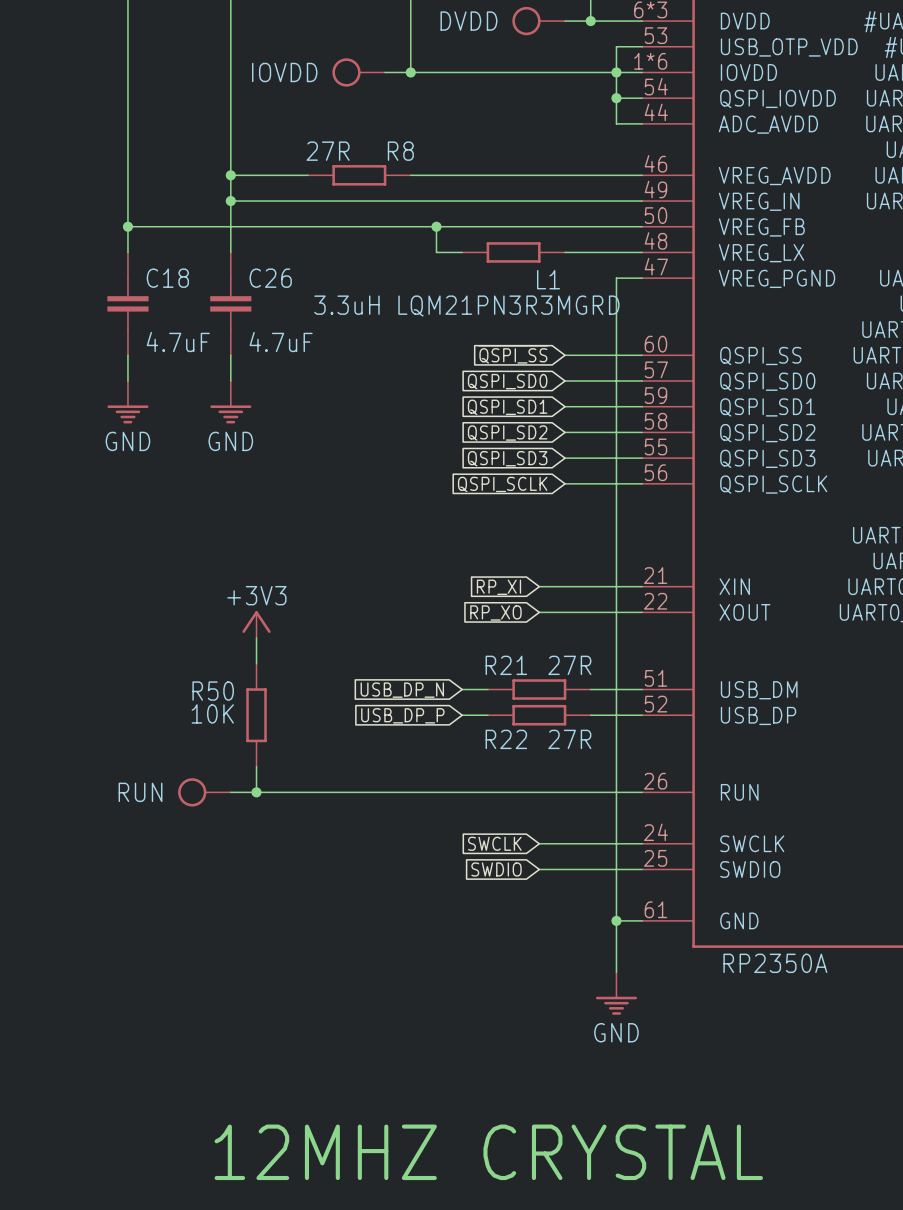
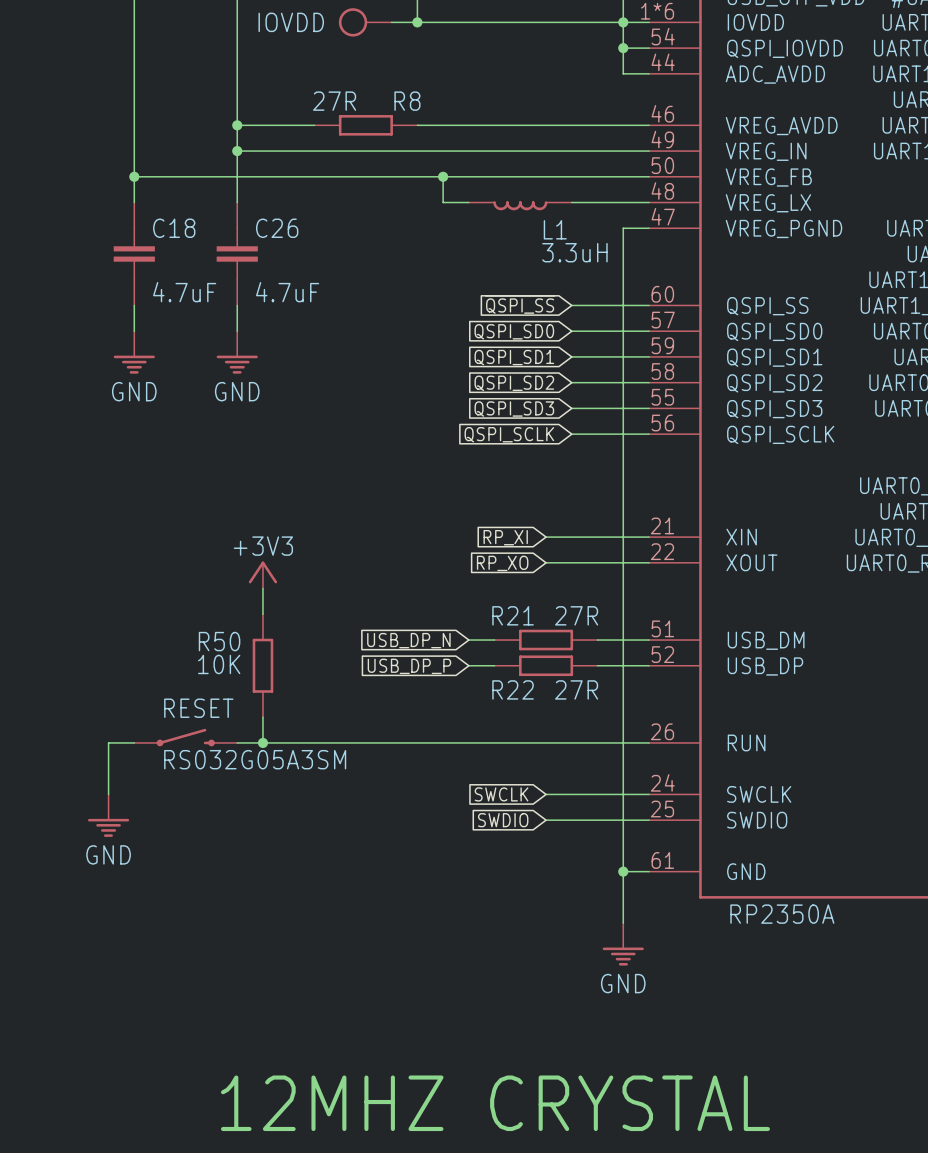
L1 symbol: [462, 242, 566, 263] -> [468, 201, 572, 211]
L1 value: 3.3uH LQM21PN3R3MGRD (466, 306) -> 3.3uH (574, 252)
RESET: none -> RS032G05A3SM (185, 737)
wire: none -> (134, 742) (108, 742) (108, 794)
RUN: (204, 792) -> none
power symbol: none -> GND (108, 815)

